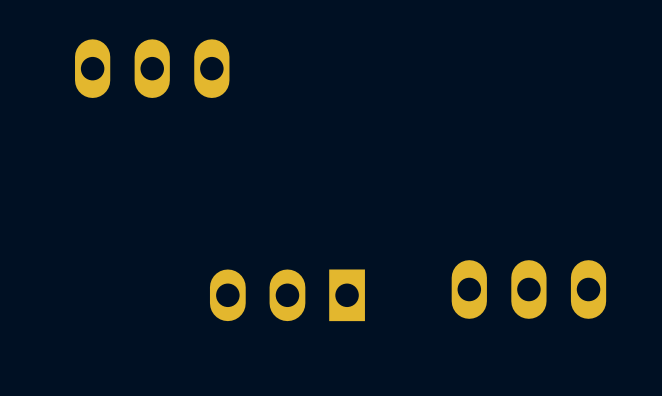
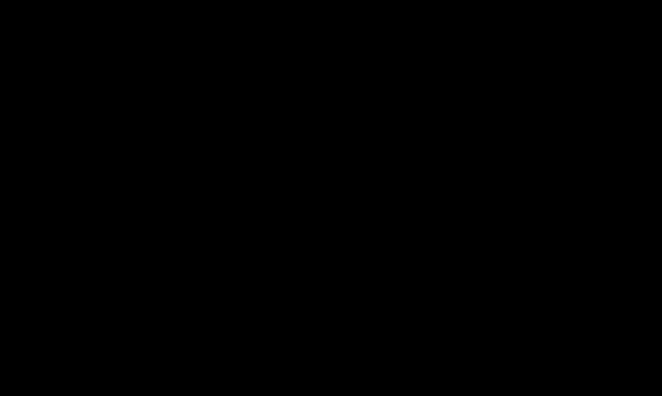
part: (152, 68) -> none
part: (528, 289) -> none
part: (287, 295) -> none

